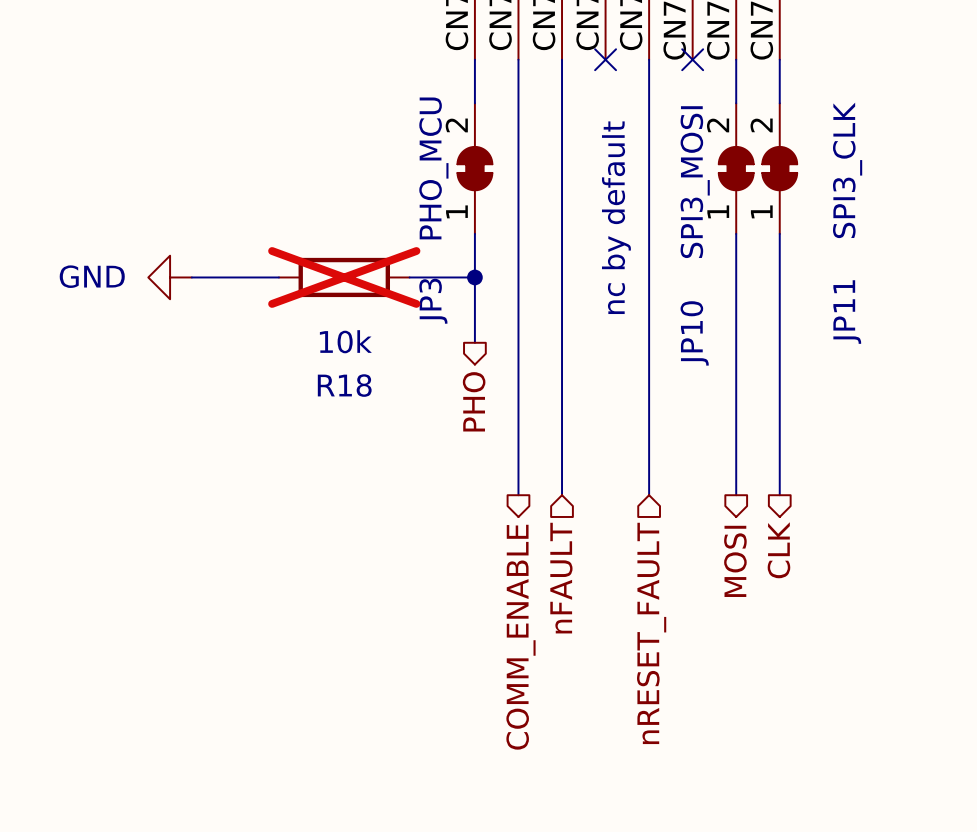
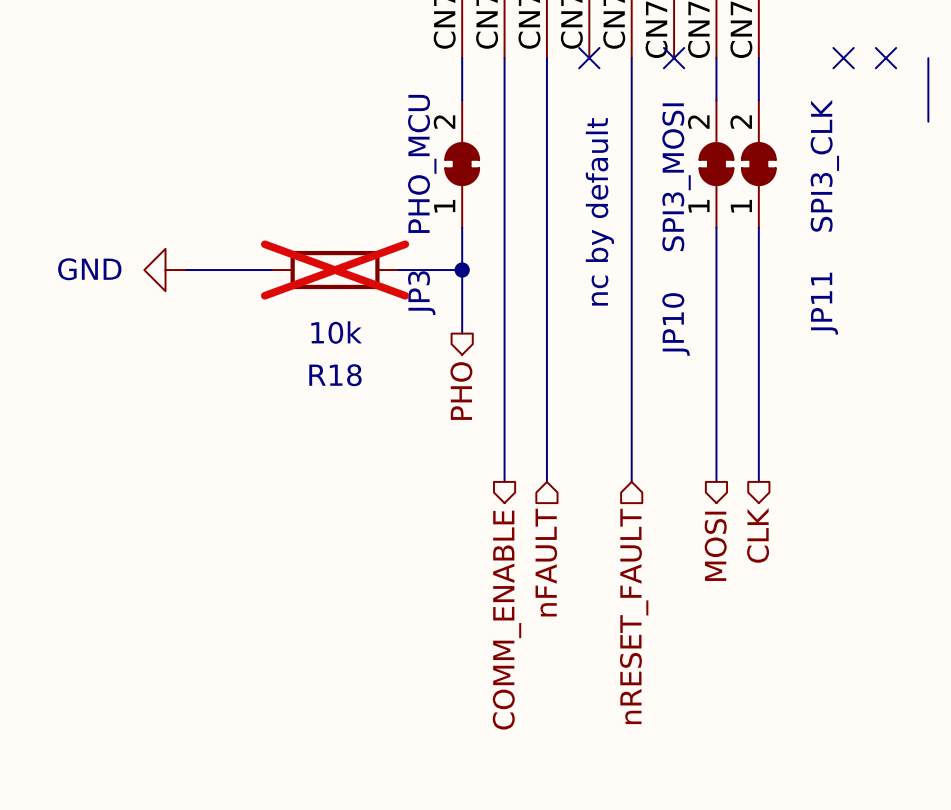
no-connect mark: none -> (843, 58)
no-connect mark: none -> (885, 58)
wire: none -> (928, 58) (928, 121)

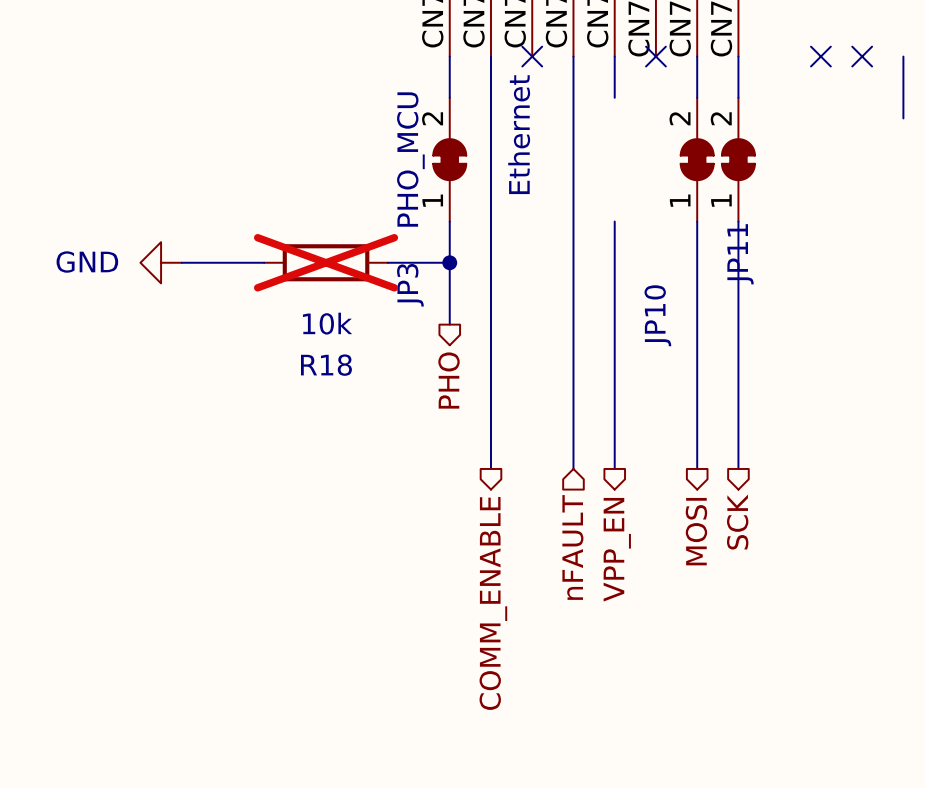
wire: (546, 58) (546, 481) -> (573, 56) (573, 468)
no-connect mark position: (589, 58) -> (532, 56)
wire: (631, 100) (631, 227) -> none
text: none -> Ethernet (519, 134)
JP11 value: SPI3_CLK (824, 165) -> none
JP10 value: SPI3_MOSI (676, 177) -> none
text: nc by default (599, 211) -> none
JP11 name position: JP11 (824, 303) -> JP11 (740, 254)
hierarchical label: CLK (758, 535) -> SCK (737, 522)
hierarchical label position: nFAULT (546, 562) -> nFAULT (572, 547)
hierarchical label shape: input (634, 616) -> output (617, 549)
hierarchical label: nRESET_FAULT (634, 616) -> VPP_EN (617, 549)

